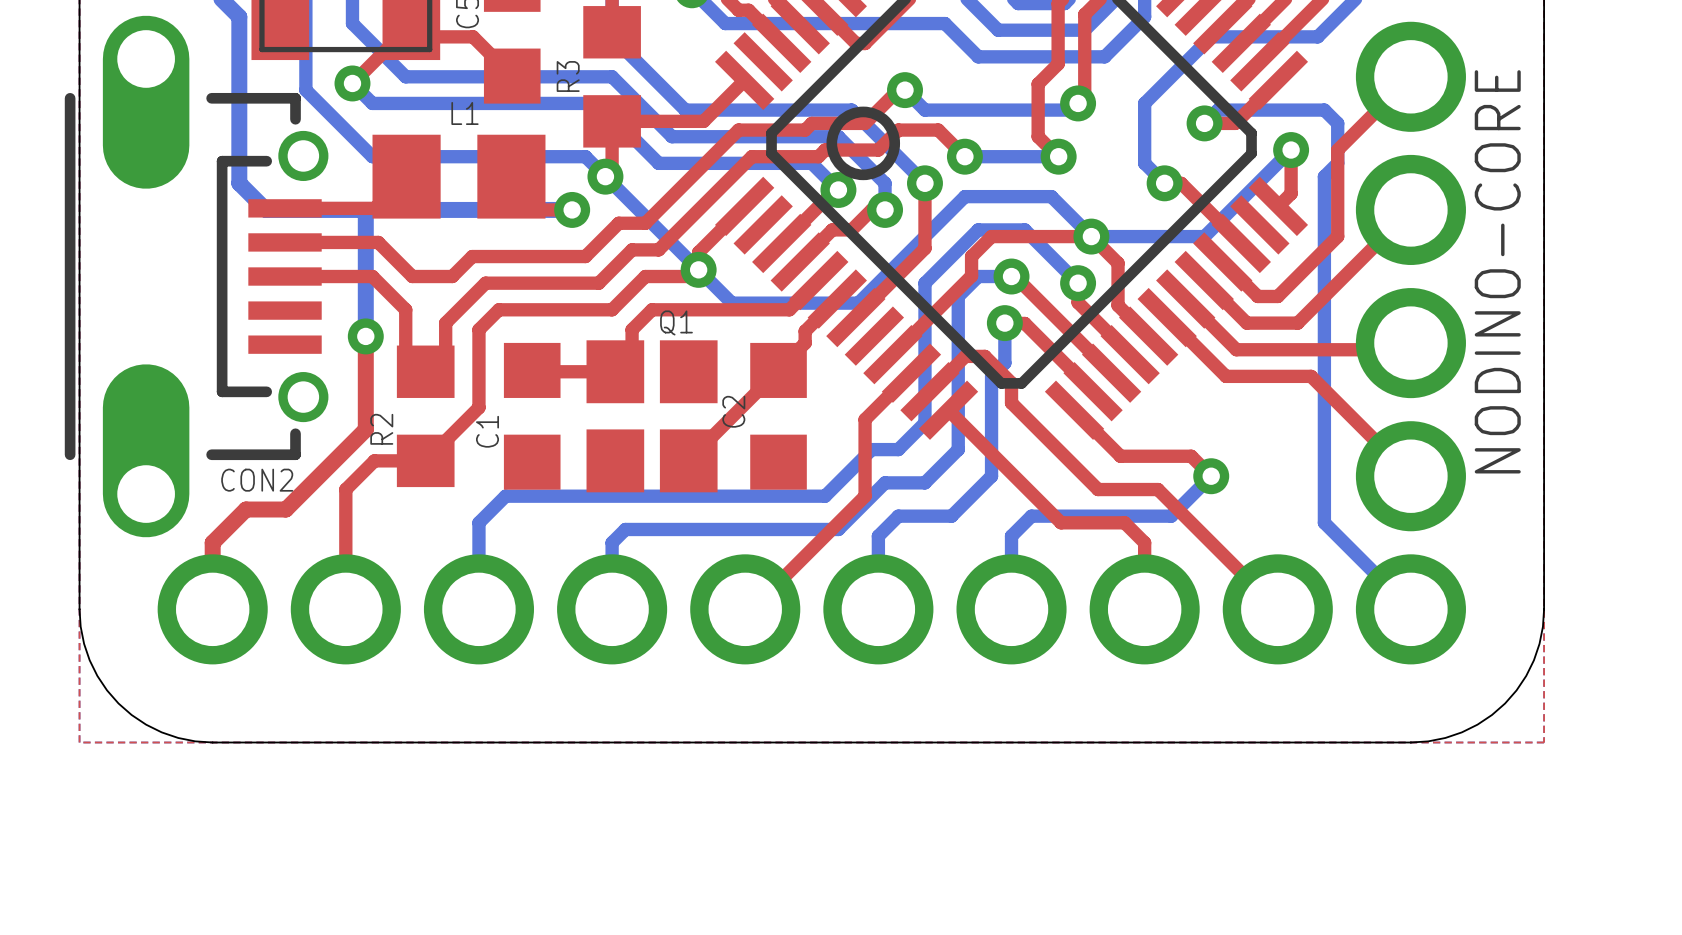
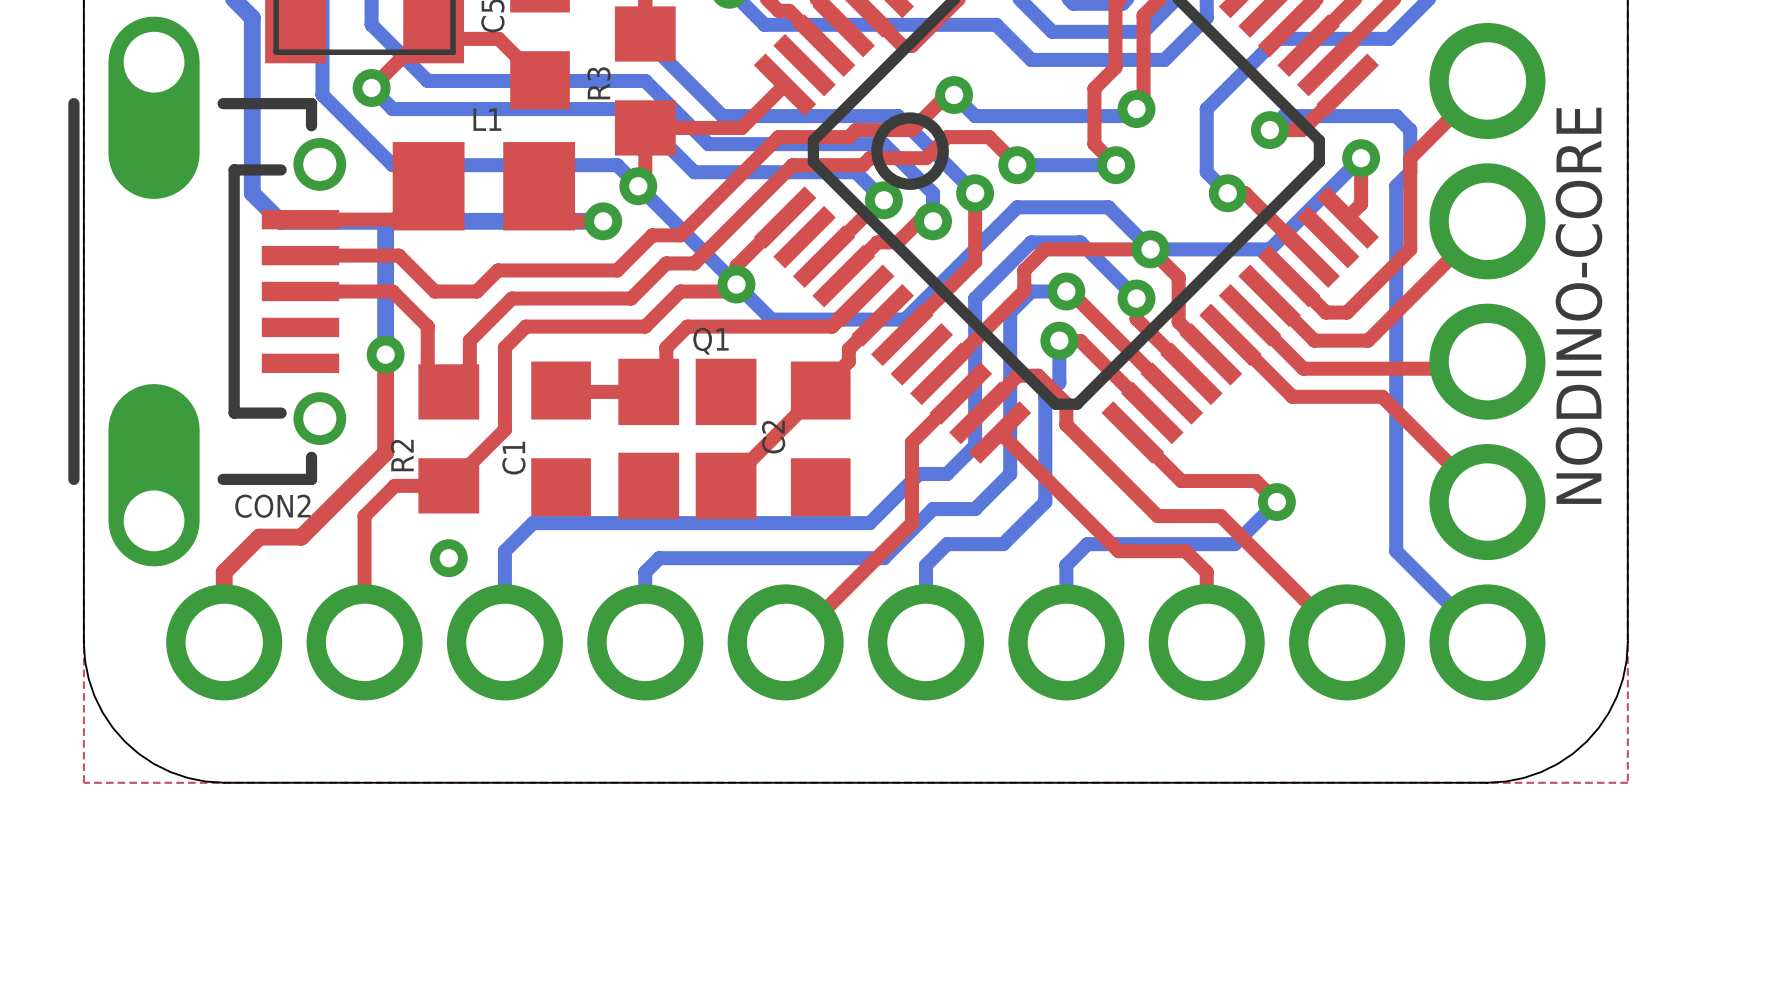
via: none -> (448, 558)

